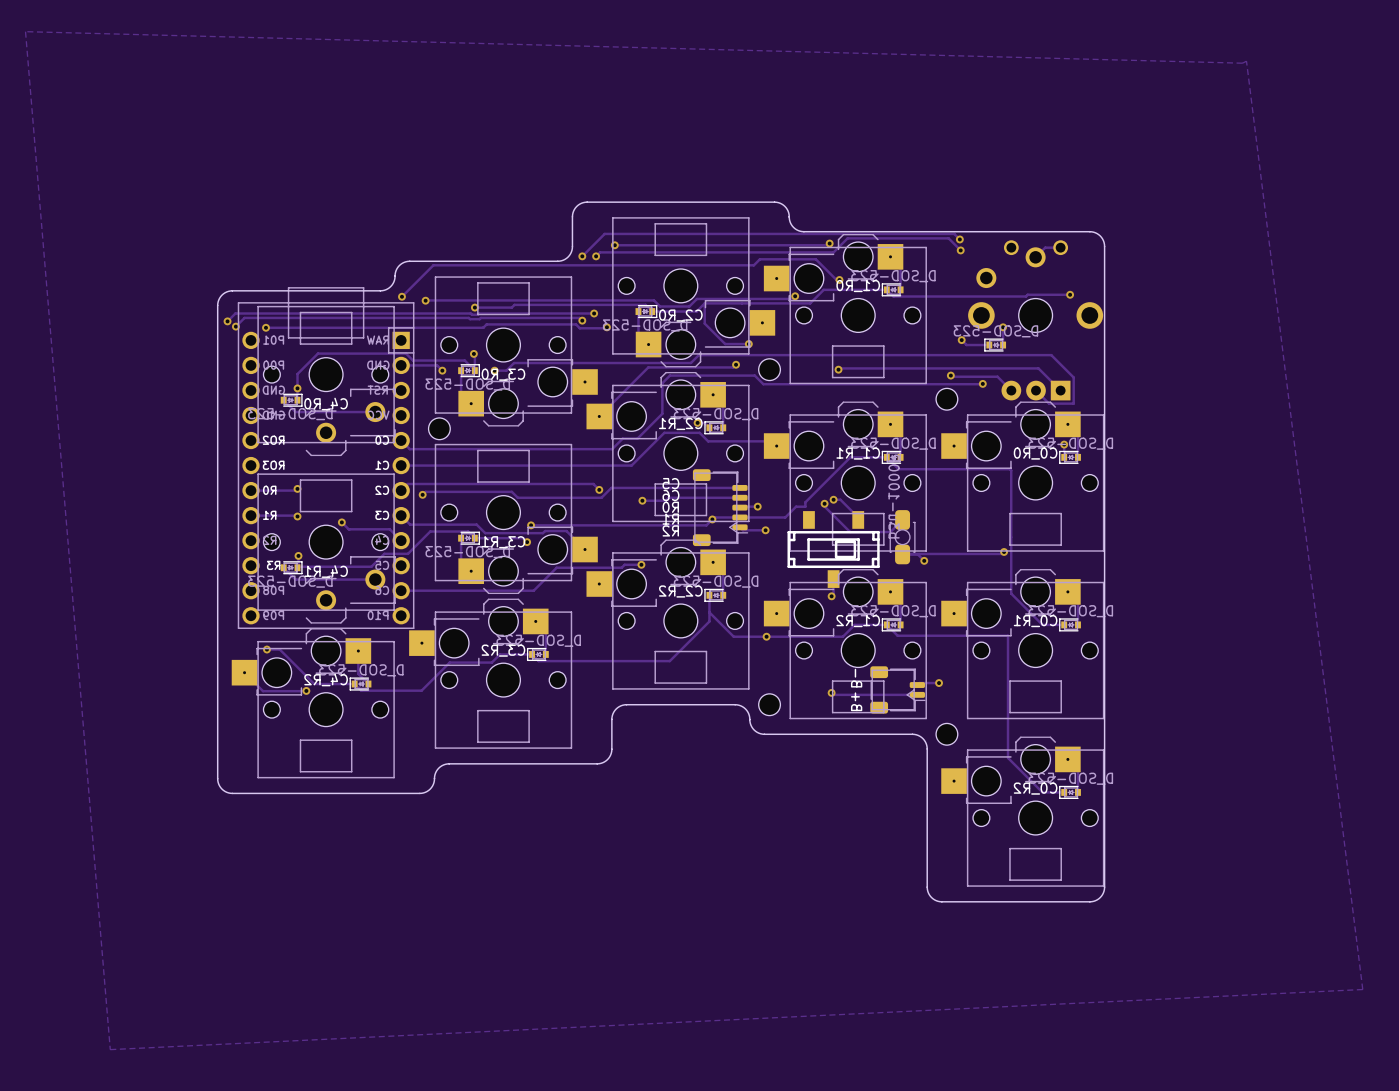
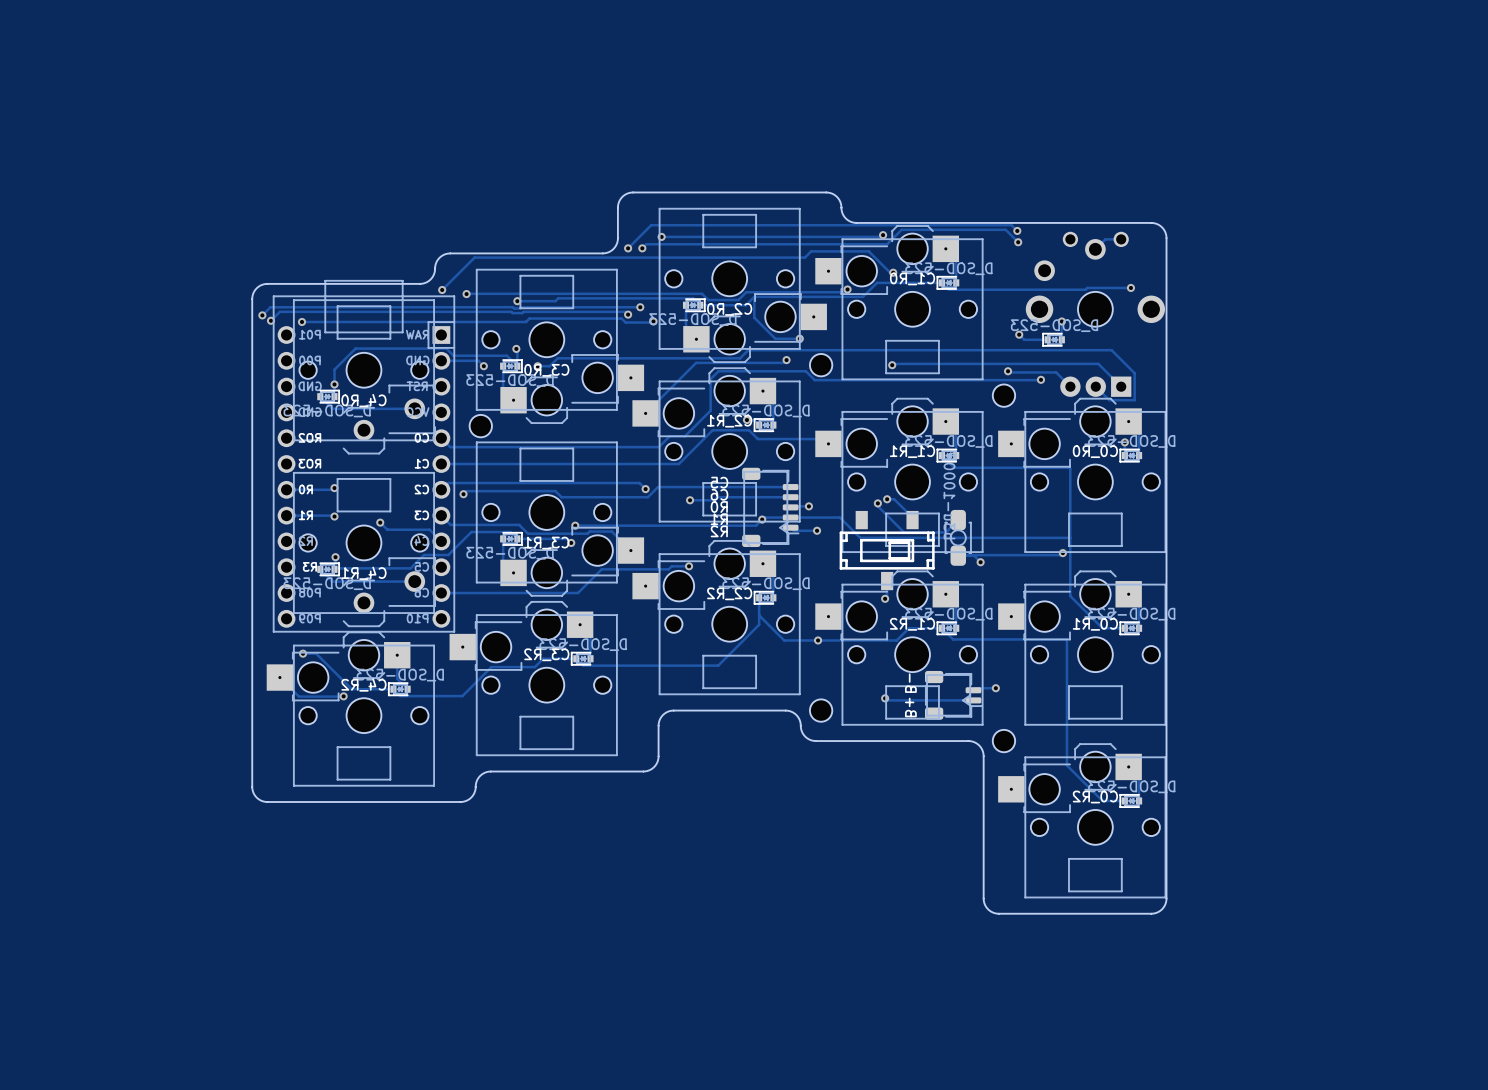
zone outline: (25, 31) (1242, 63) (1246, 61) (1362, 989) (110, 1049) (25, 31) -> none
track: (886, 457) (850, 457) (805, 502) (805, 506) (796, 506) (785, 517) -> (1070, 537) (860, 537) (839, 517) (837, 517)

